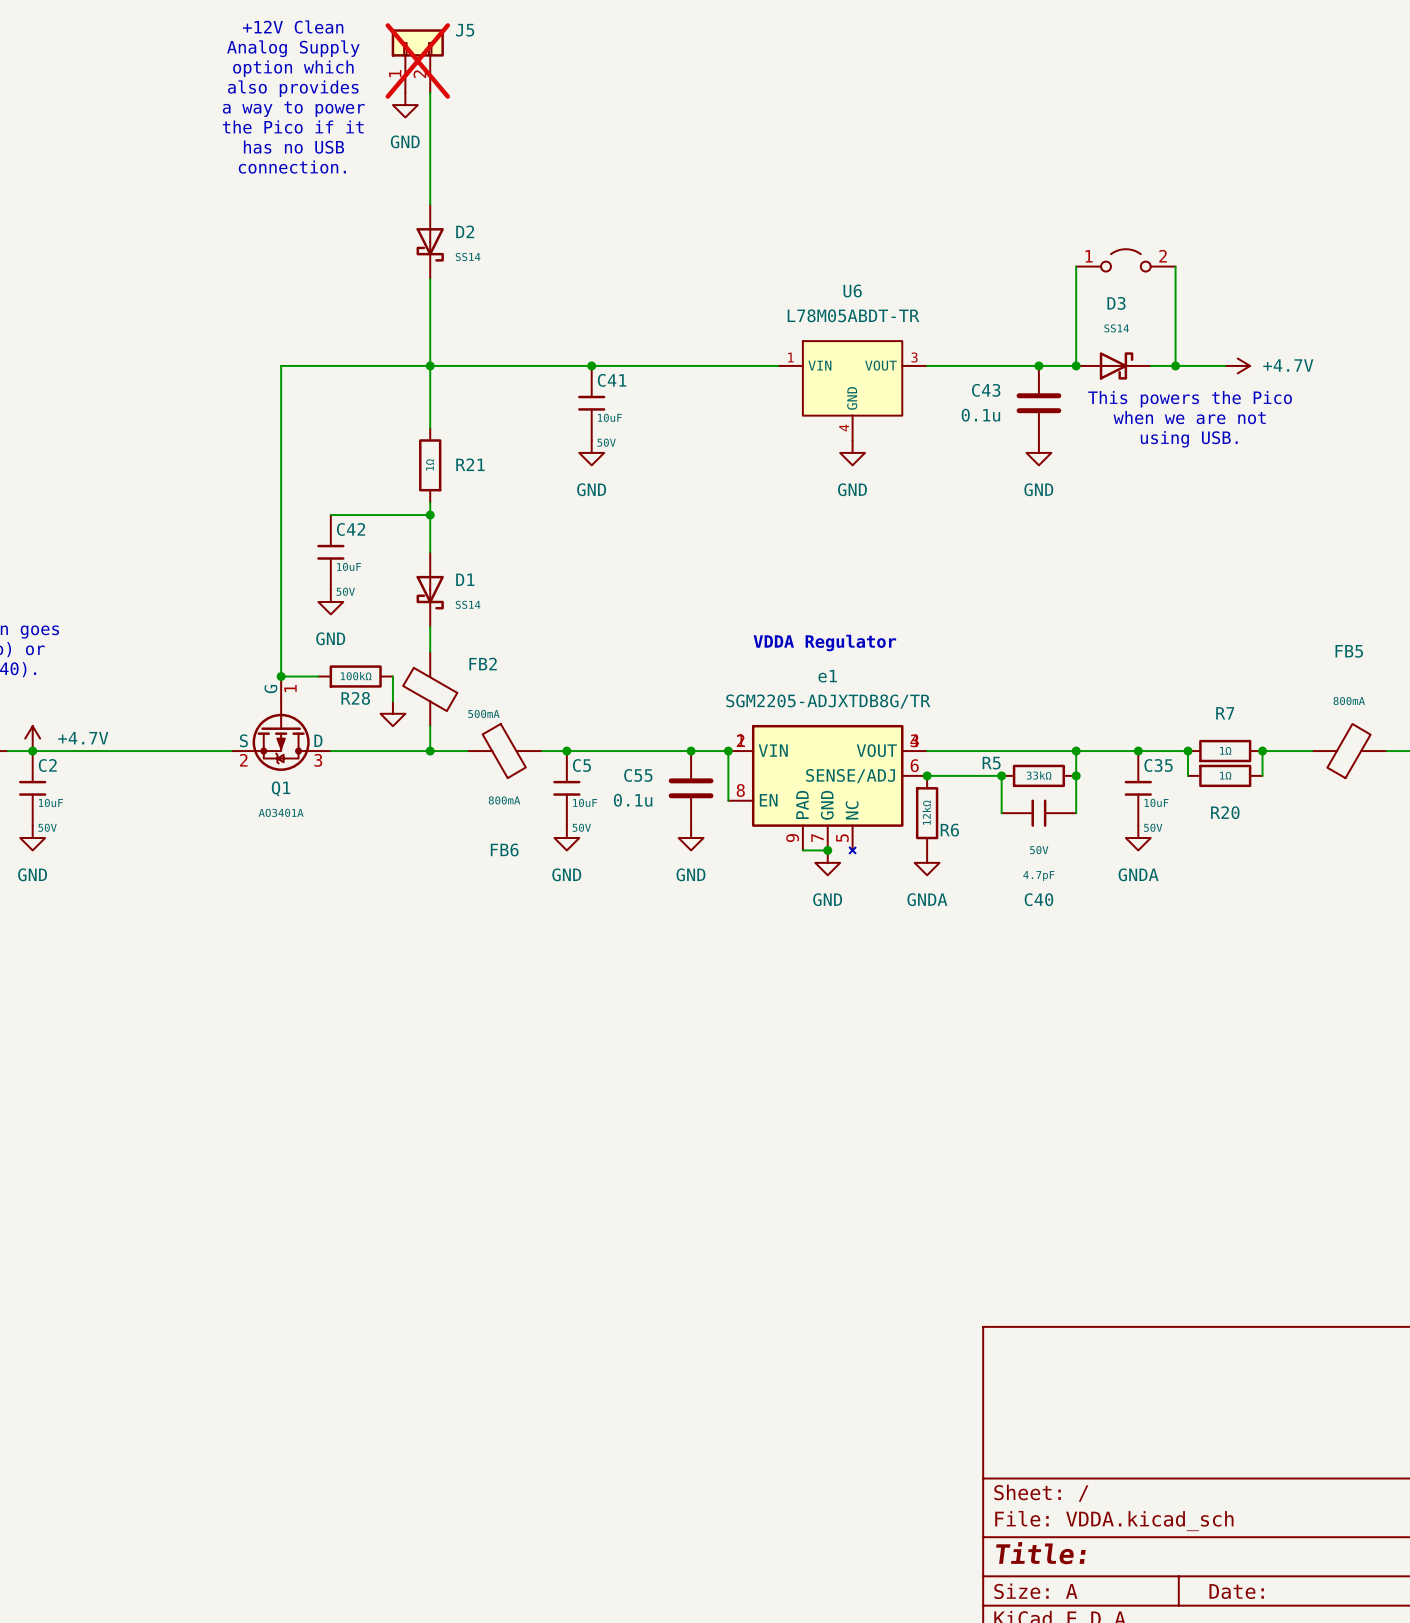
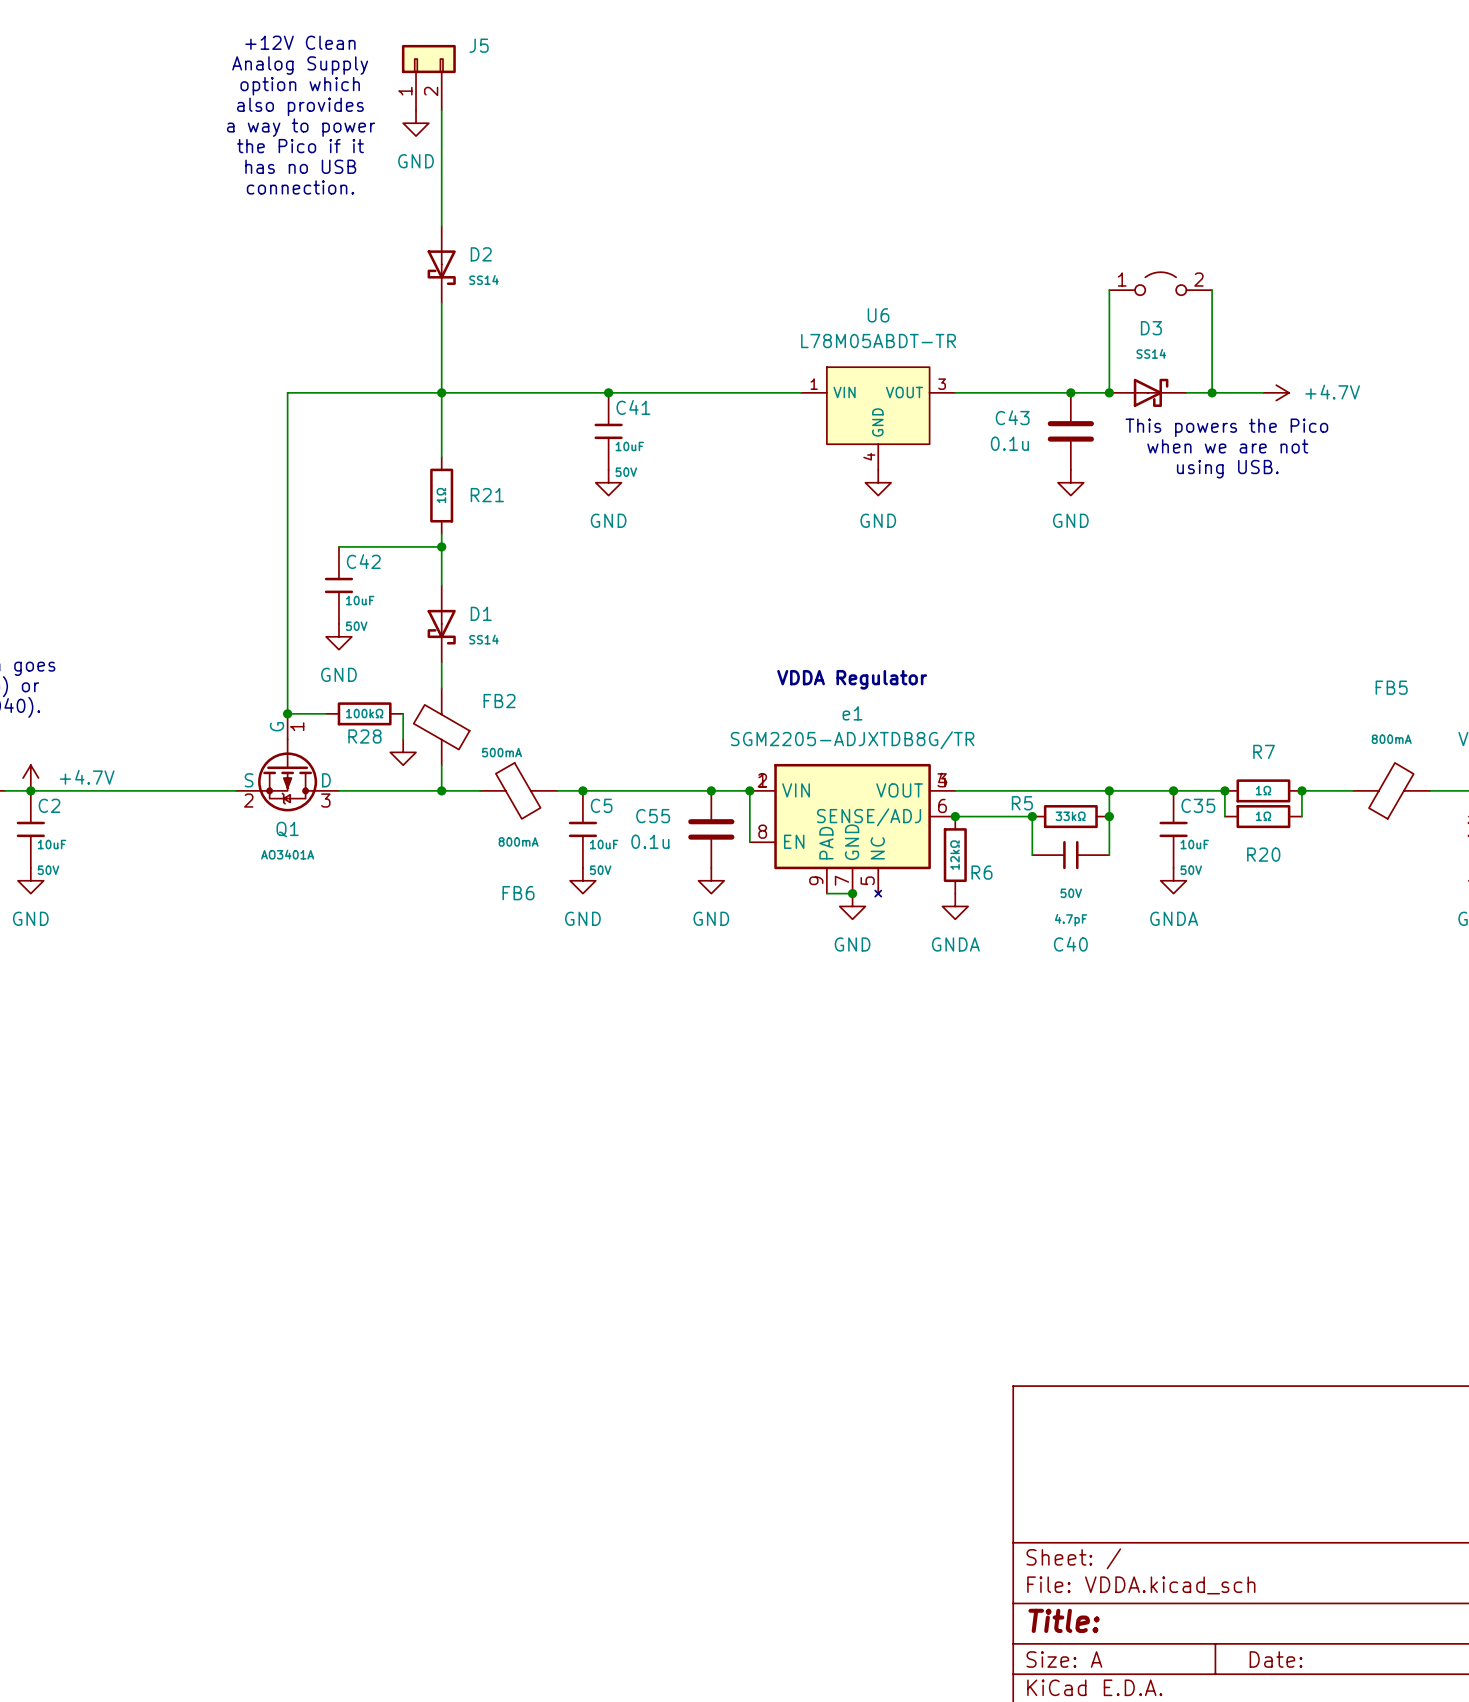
J5 do-not-place cross: (417, 60) -> none

